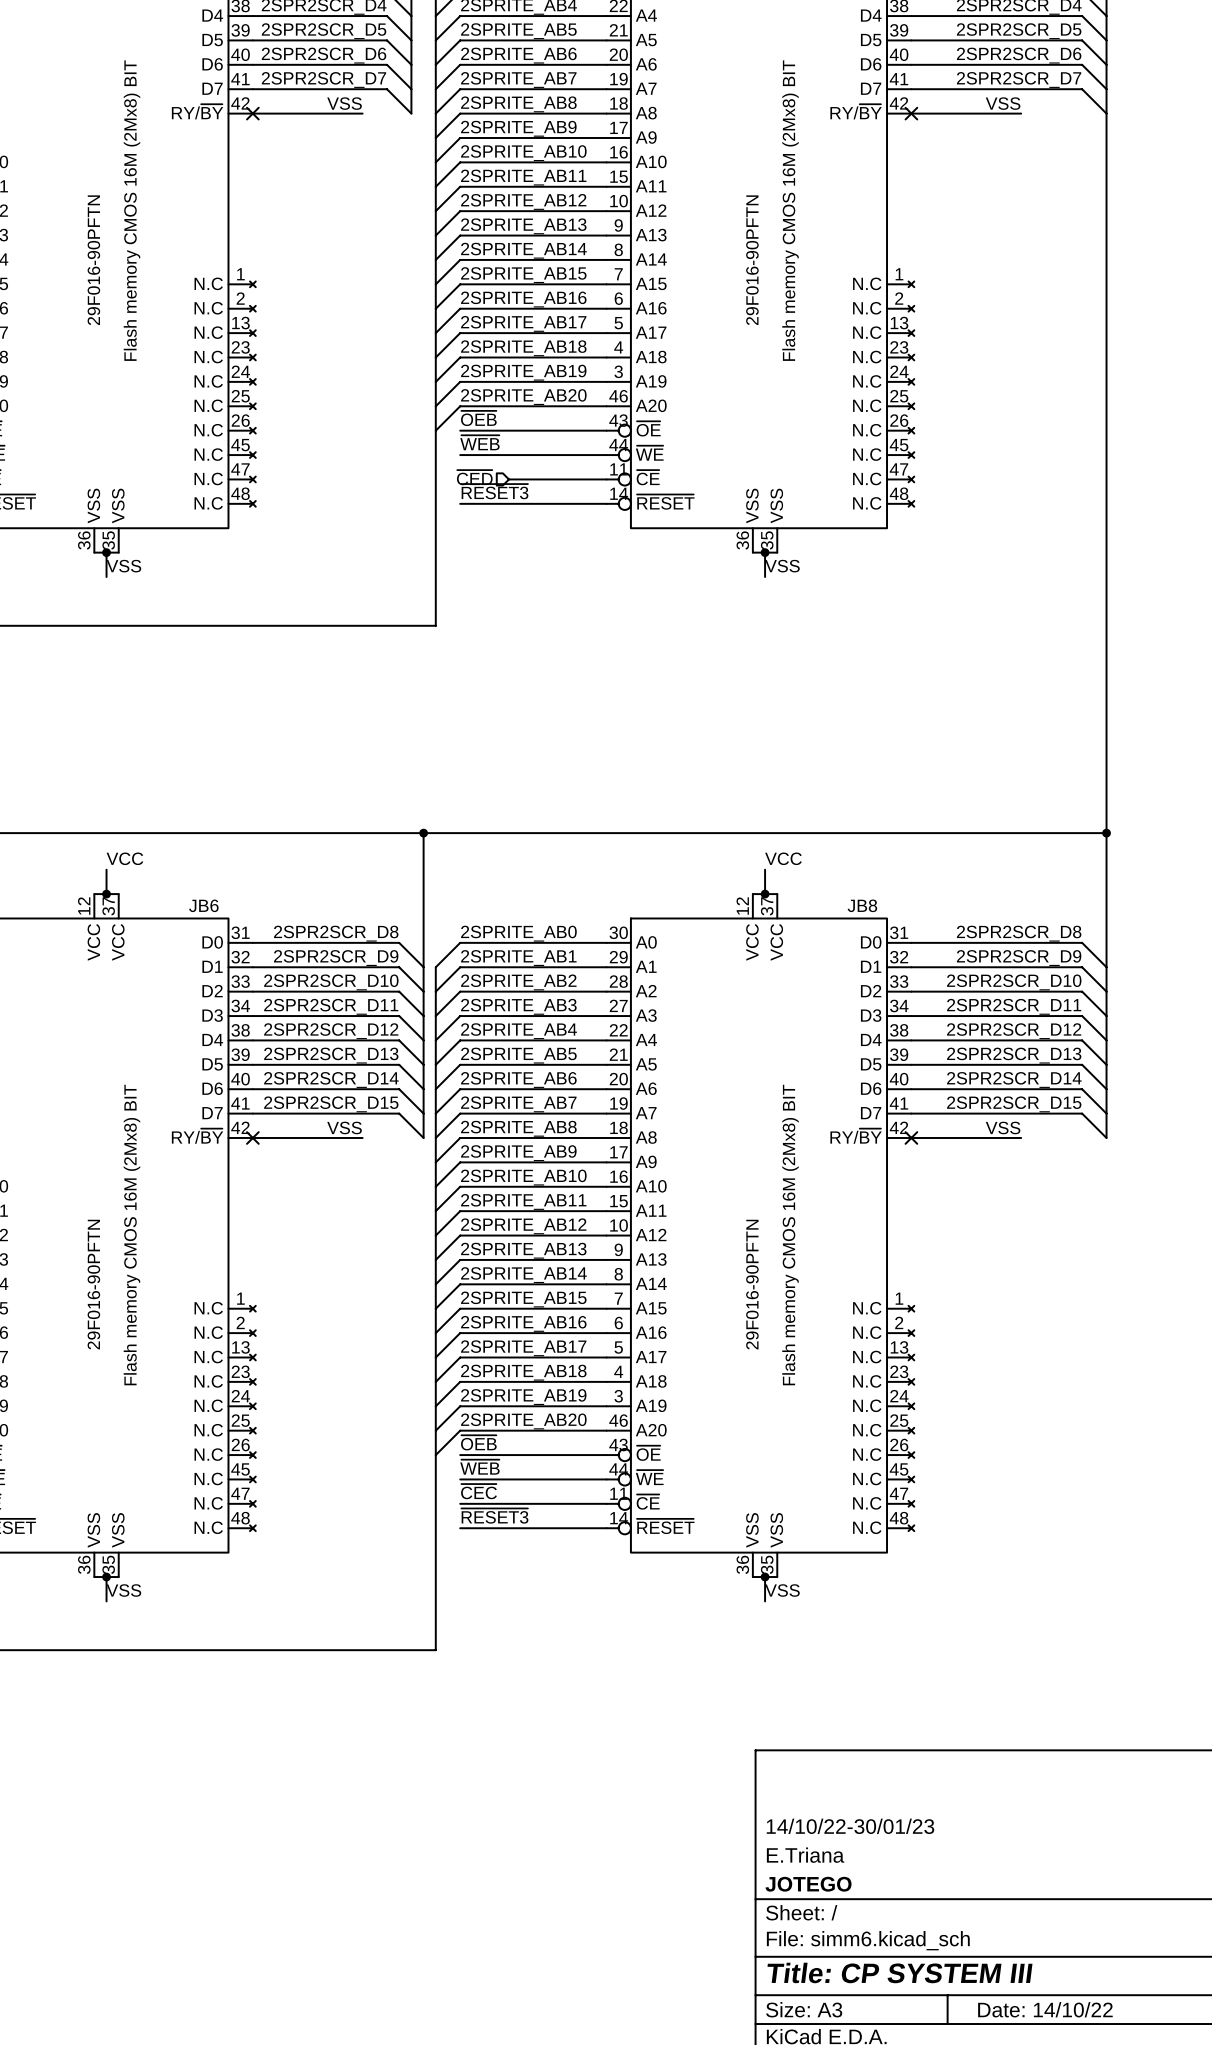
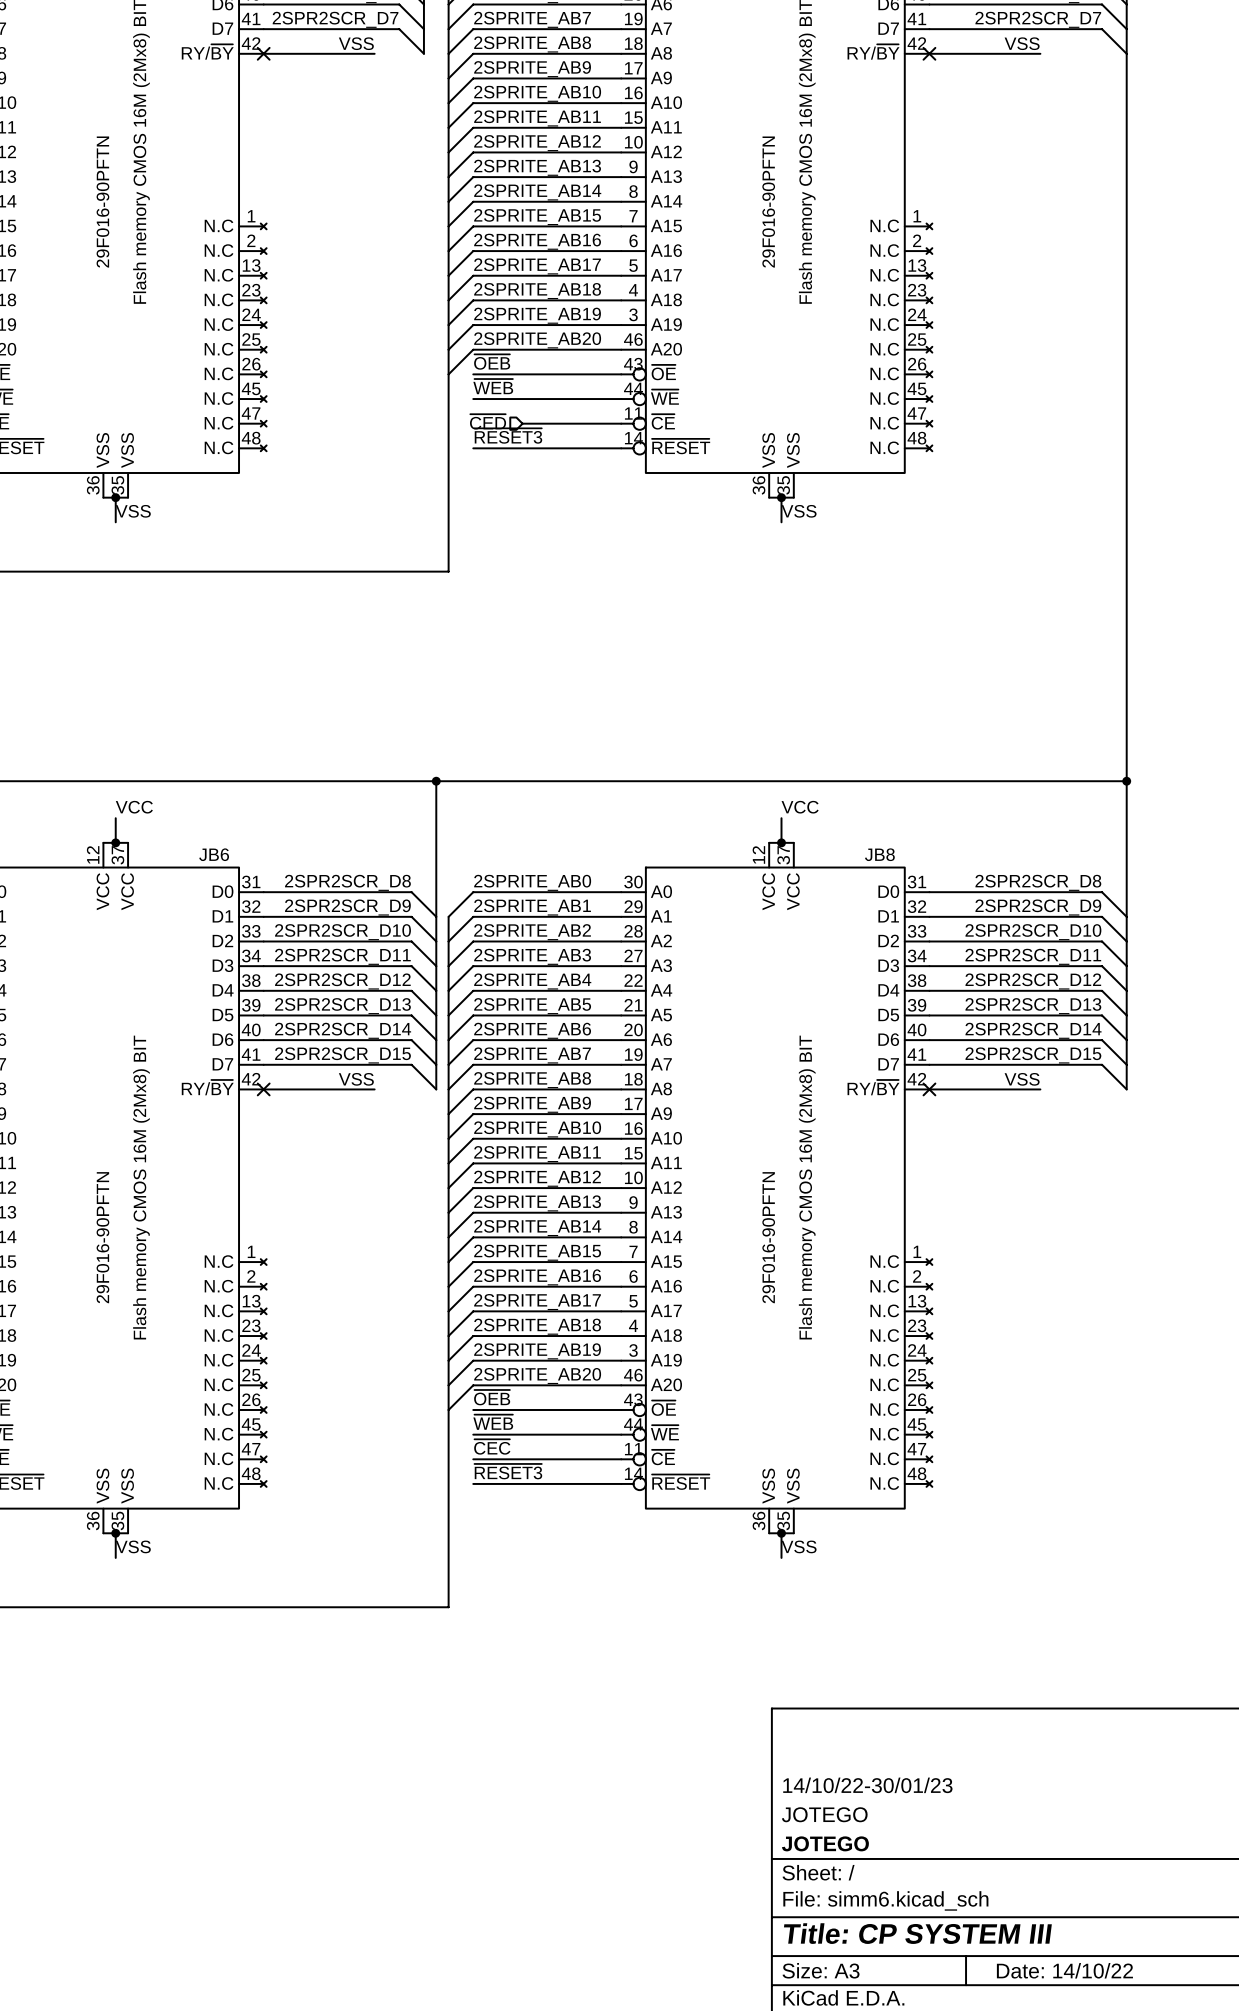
title block: E.Triana (805, 1855) -> JOTEGO (824, 1814)

